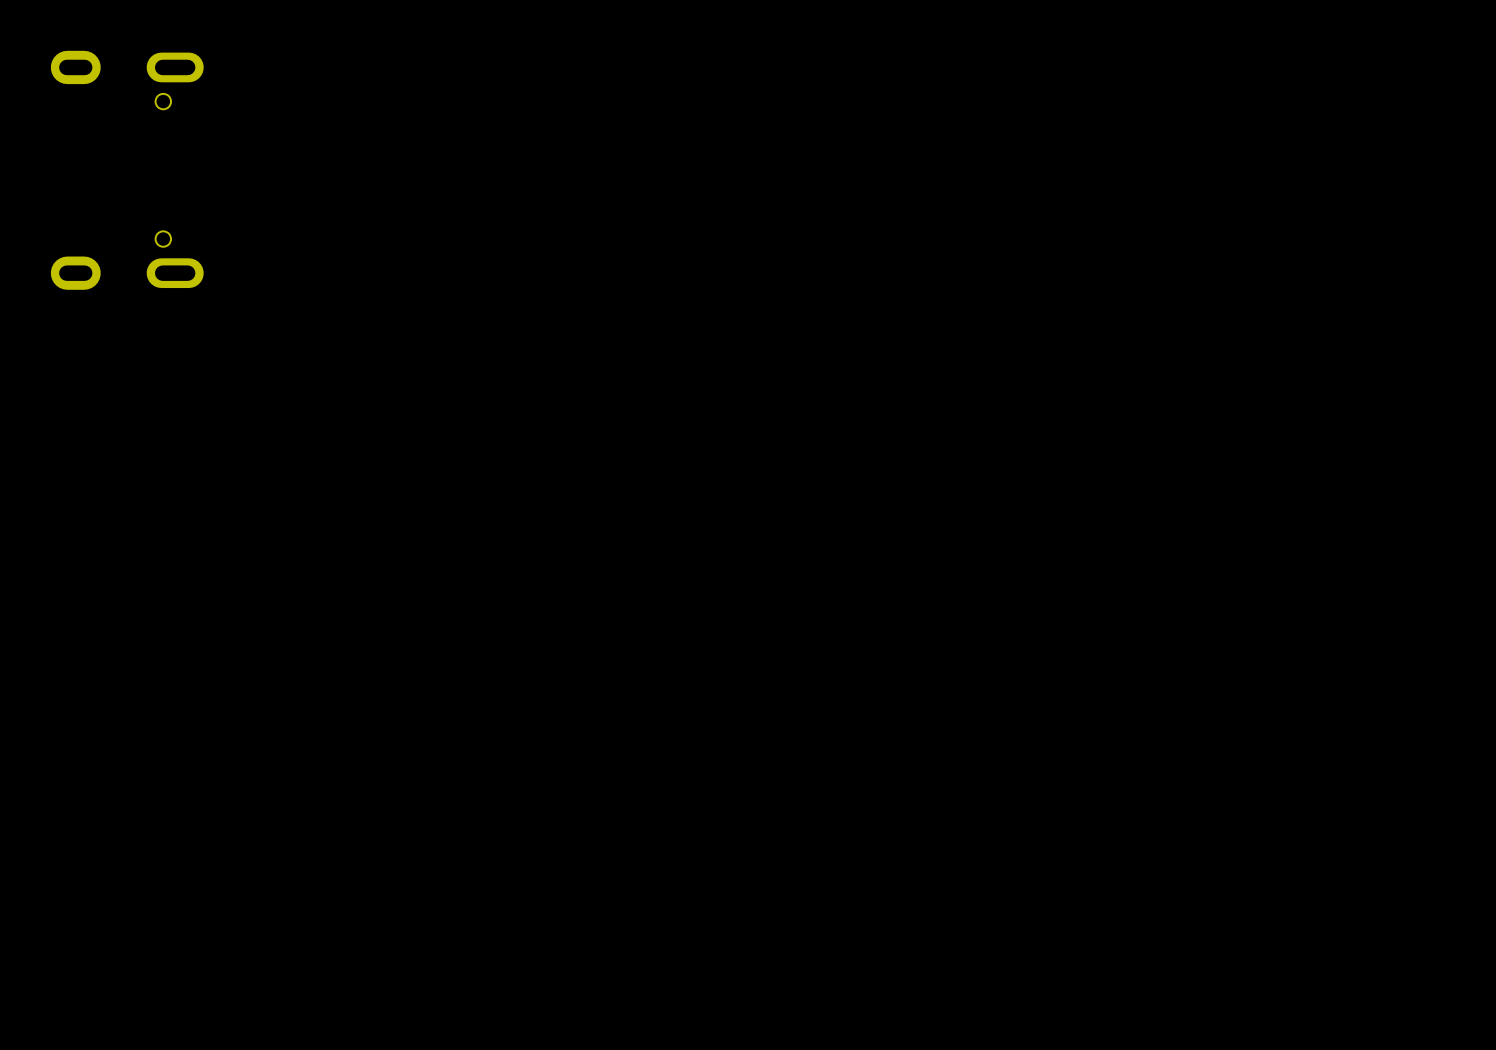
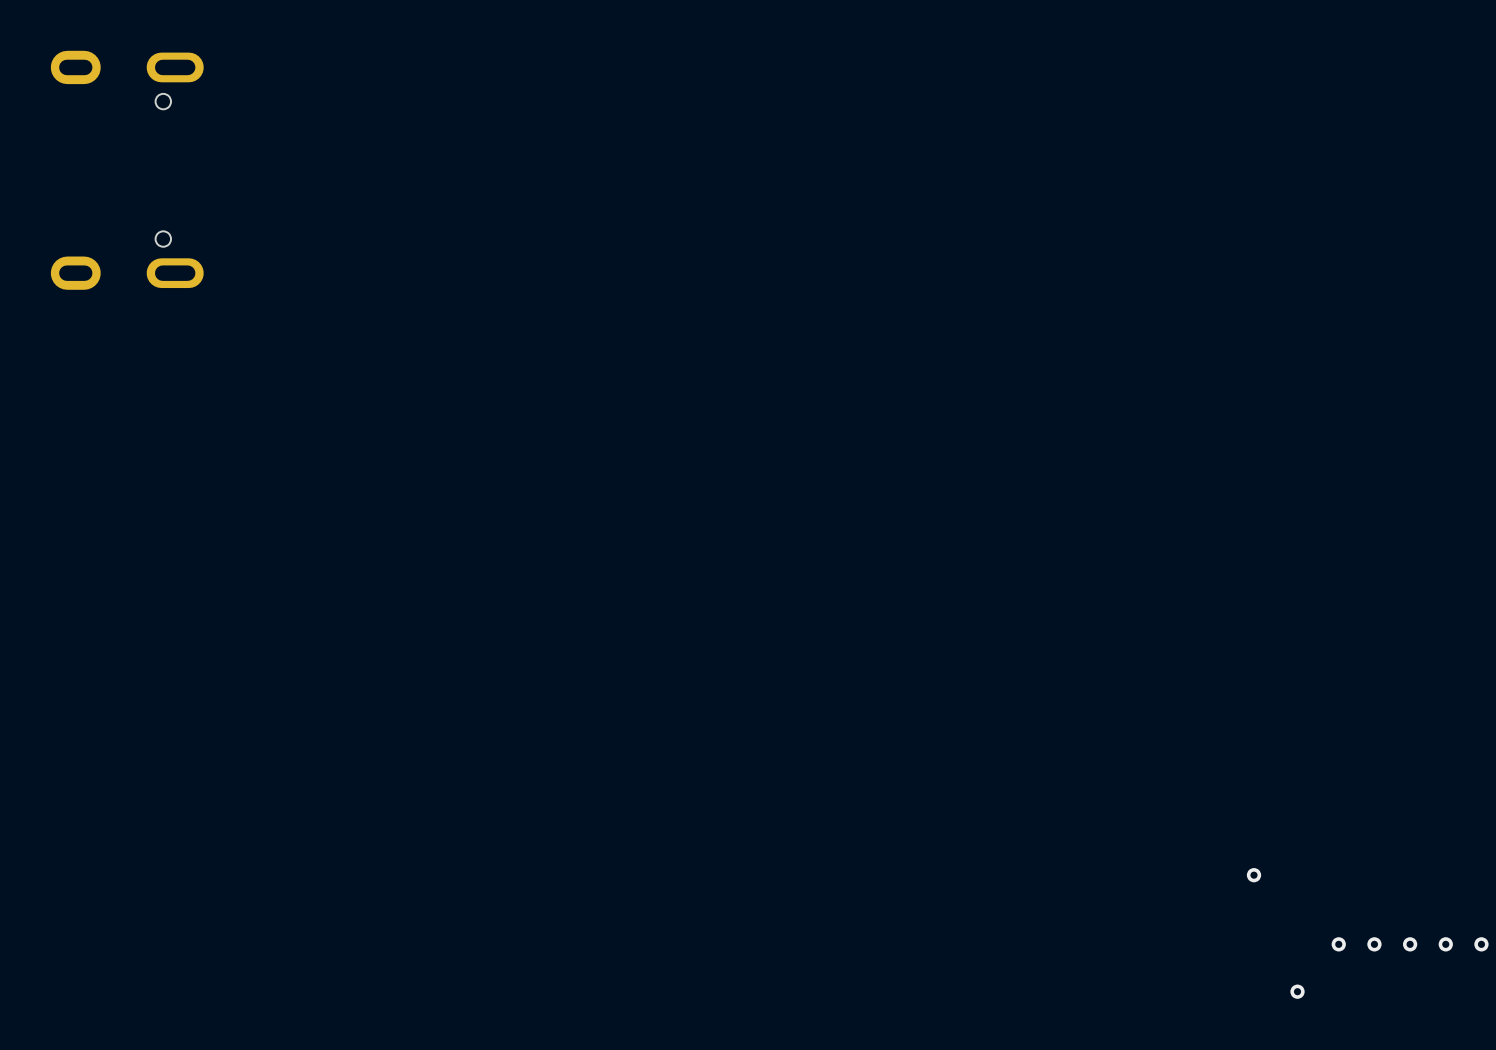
via: none -> (1253, 875)
via: none -> (1338, 944)
via: none -> (1374, 944)
via: none -> (1410, 944)
via: none -> (1445, 944)
via: none -> (1481, 944)
via: none -> (1297, 991)

